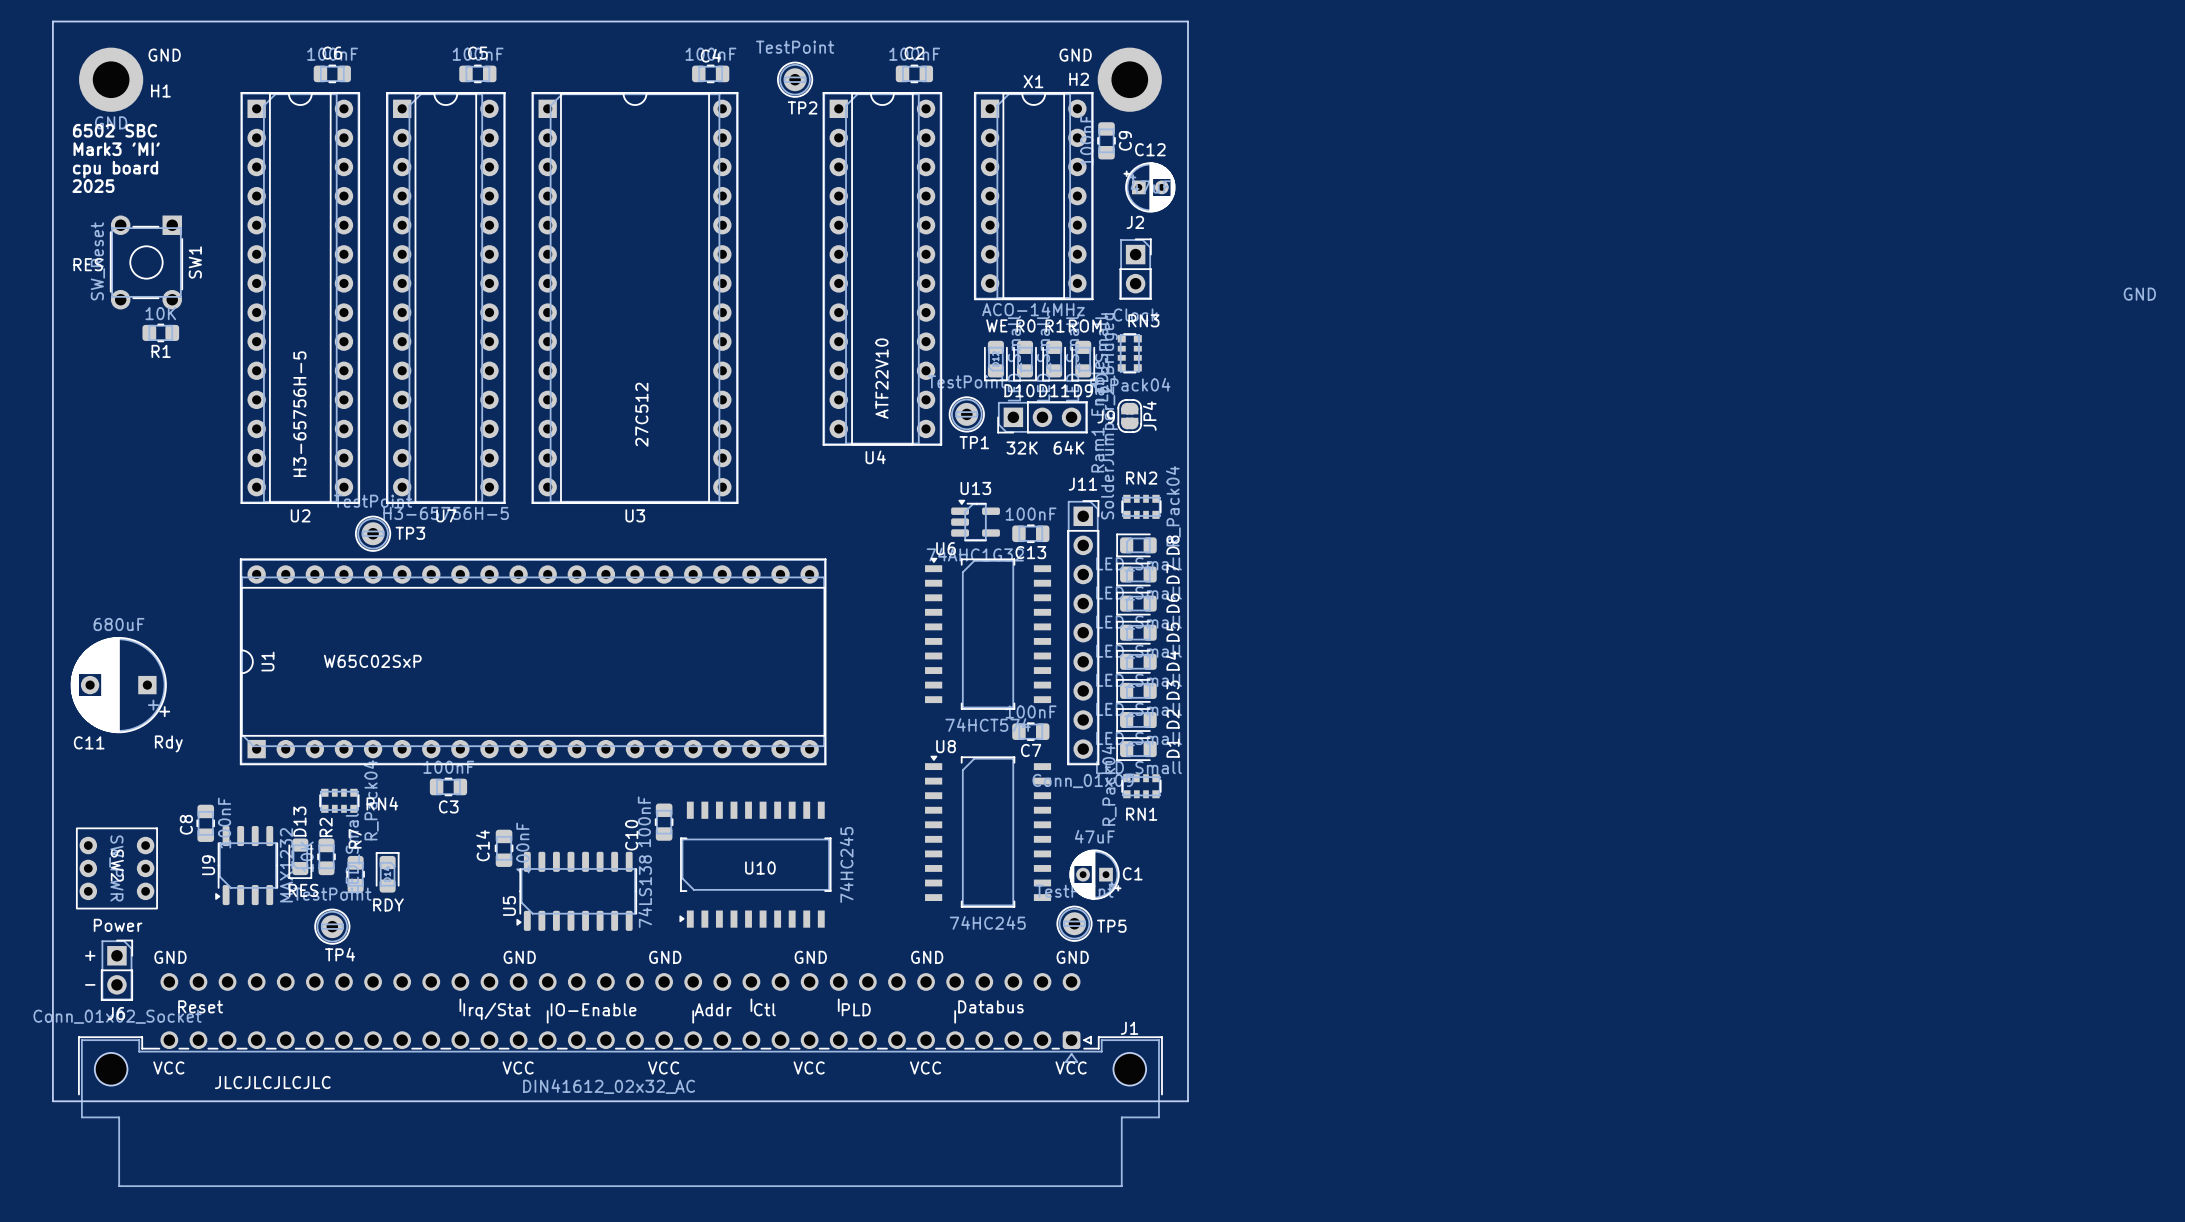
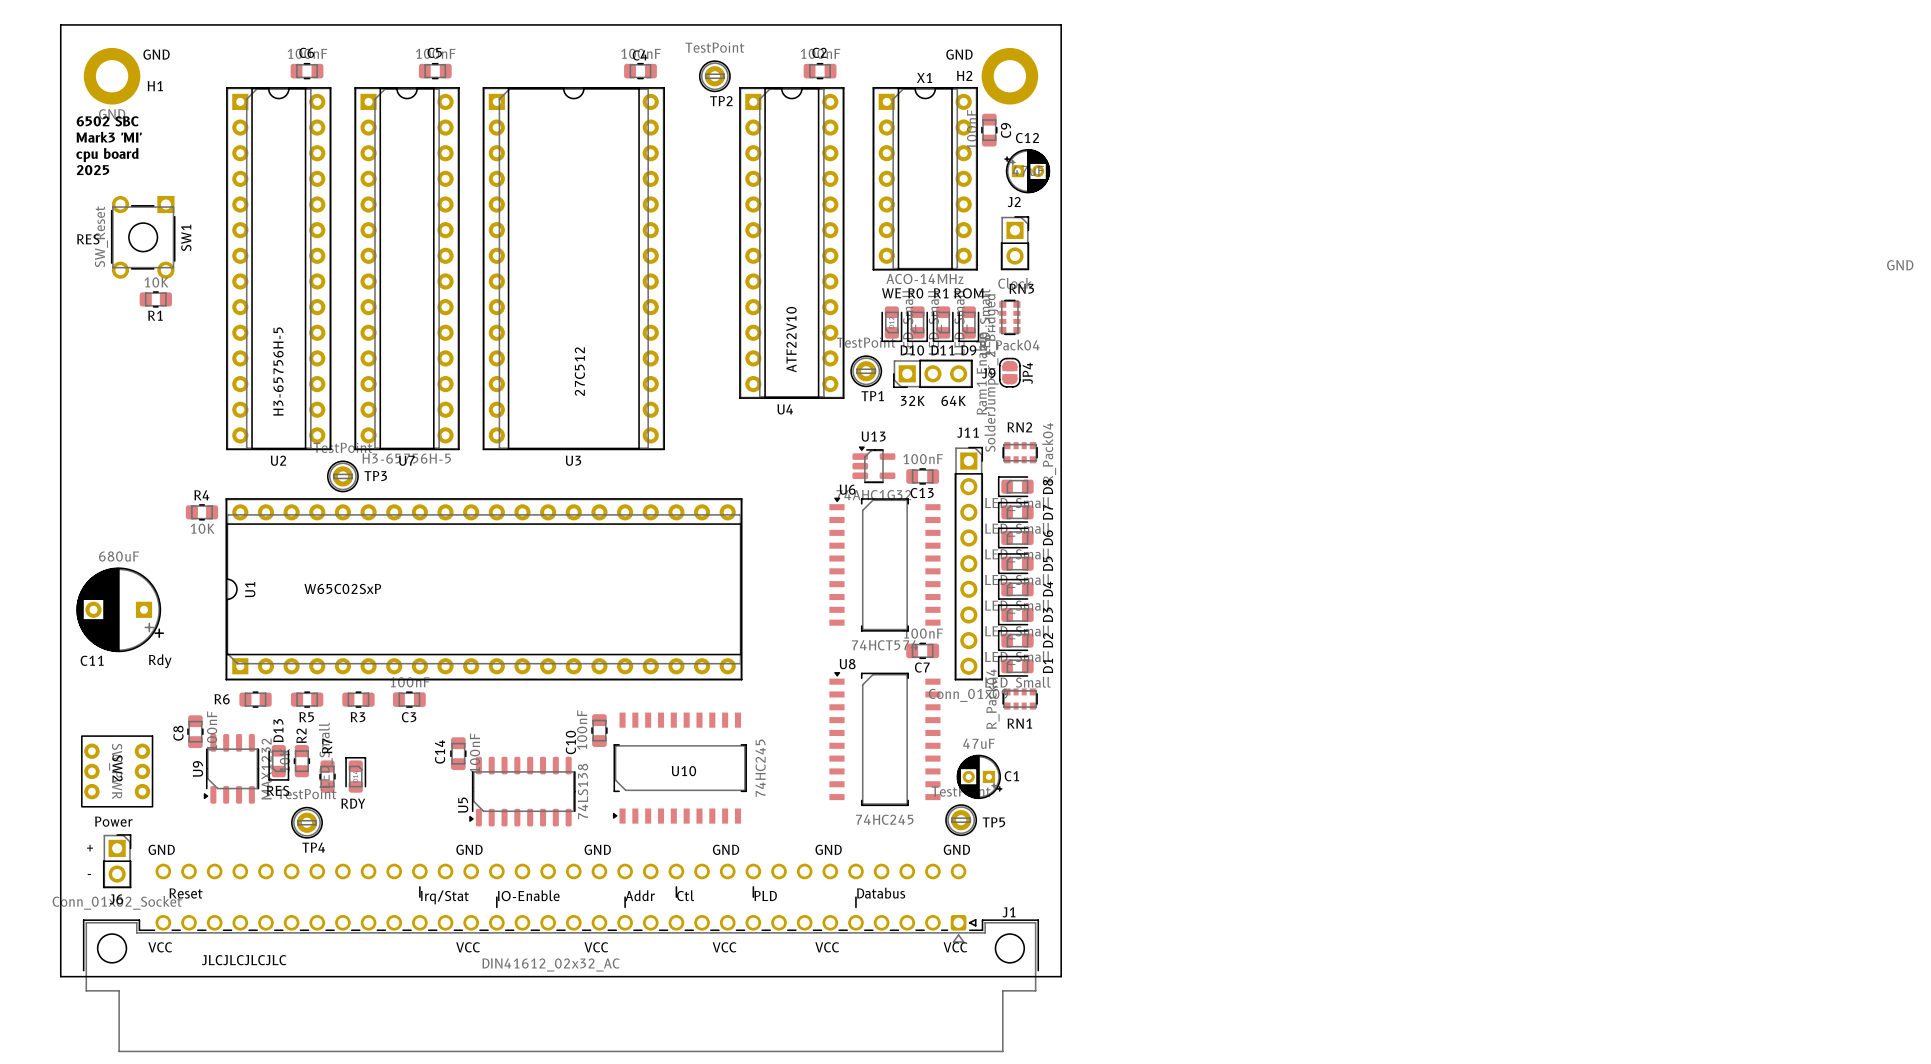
R4: none -> 10K (201, 512)
R6: none -> (255, 699)
R5: none -> (307, 699)
R3: none -> (358, 699)
RN4: R_Pack04 (339, 800) -> none

